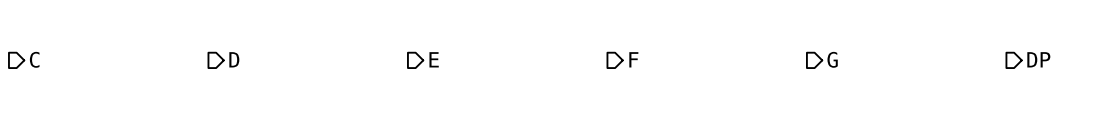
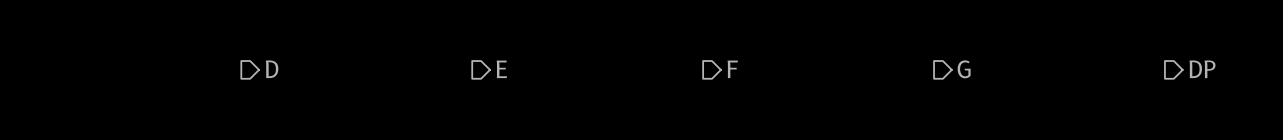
hierarchical label: C (34, 59) -> none

